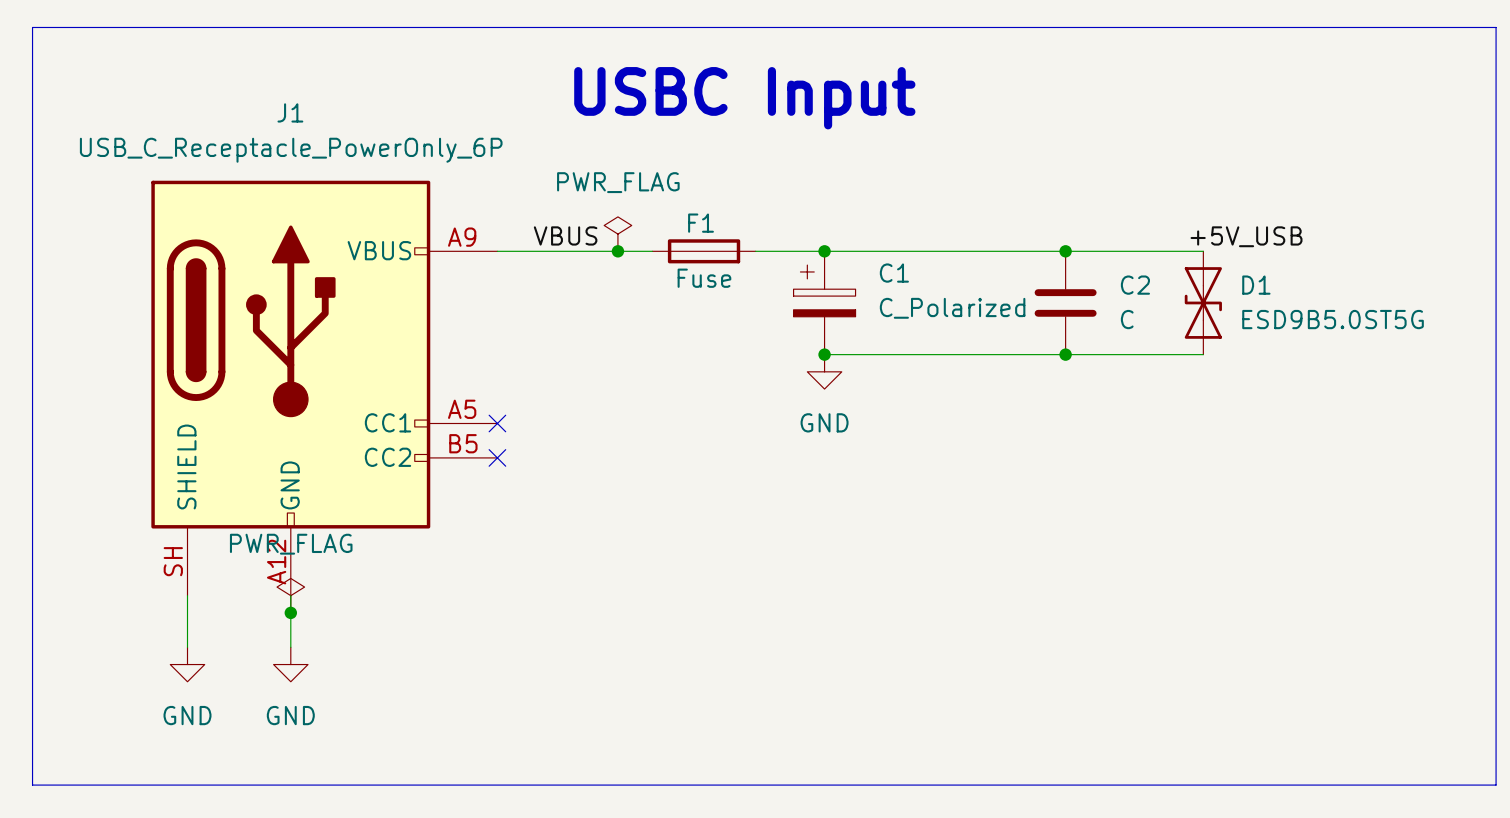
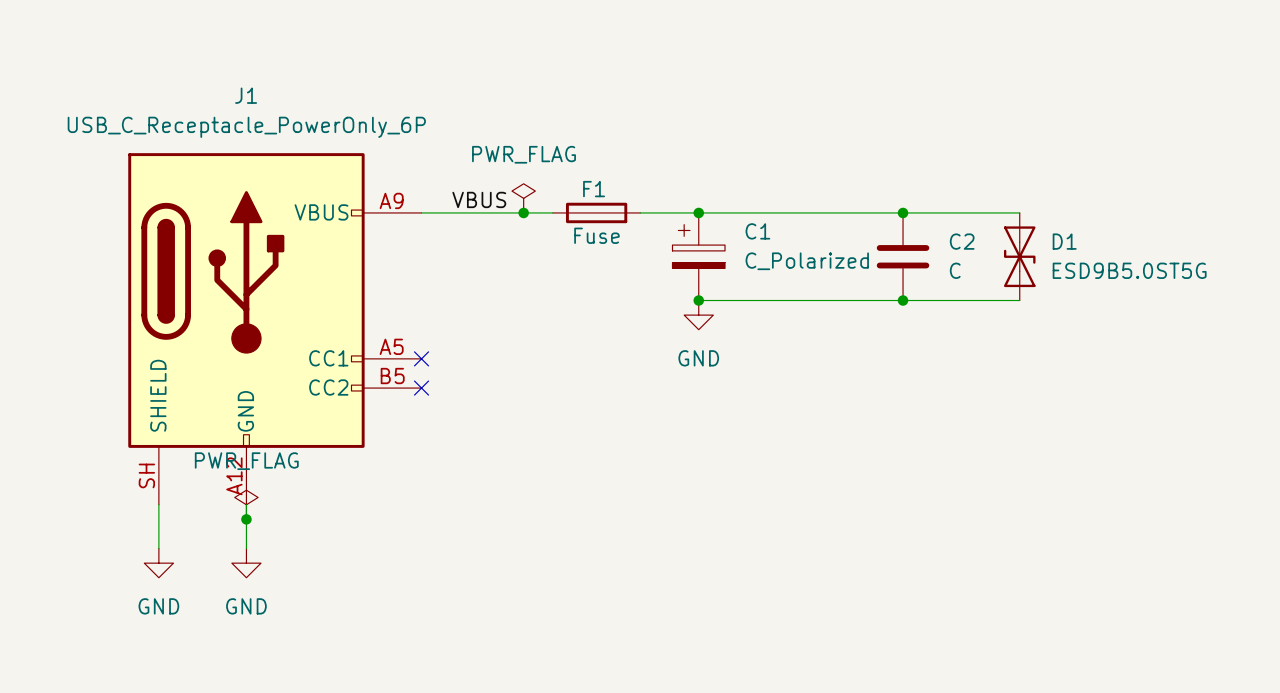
line: (32, 27) (1496, 27) (1496, 785) (32, 785) (32, 27) -> none
text: USBC Input (744, 98) -> none
label: +5V_USB (1246, 236) -> none

